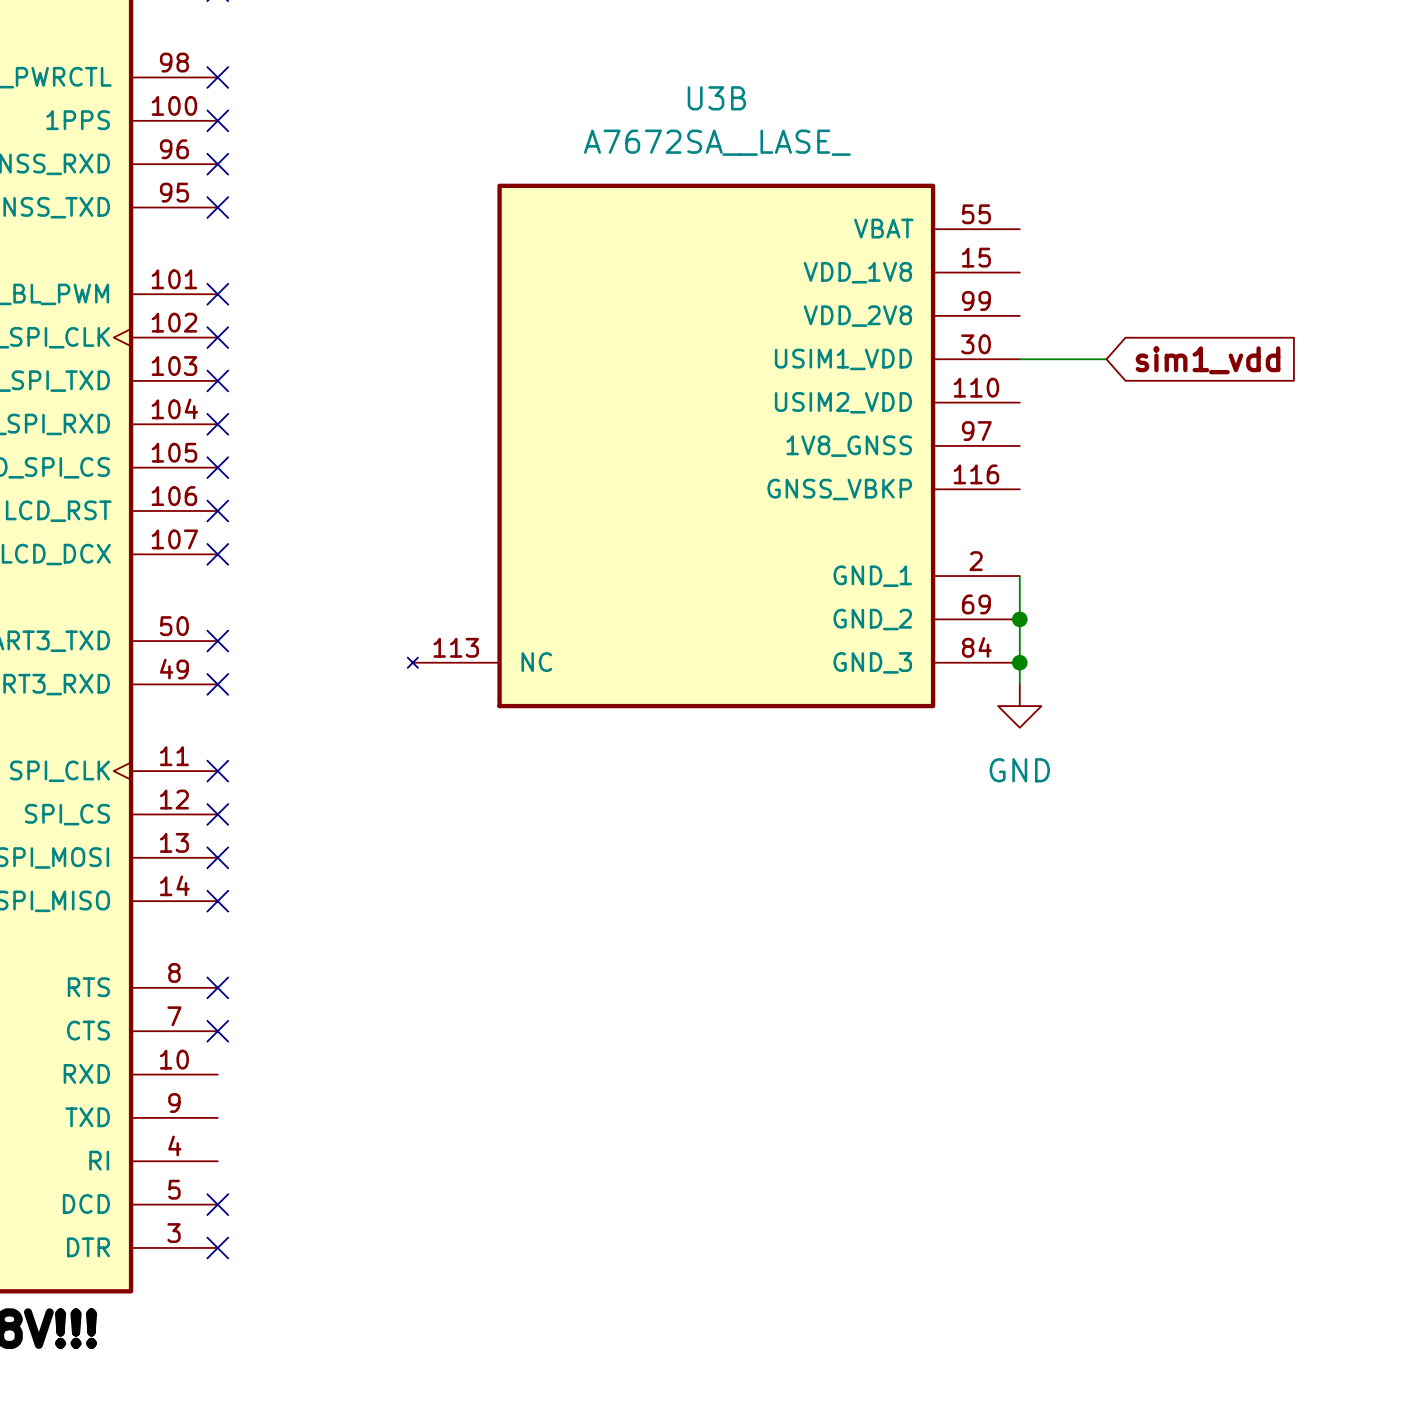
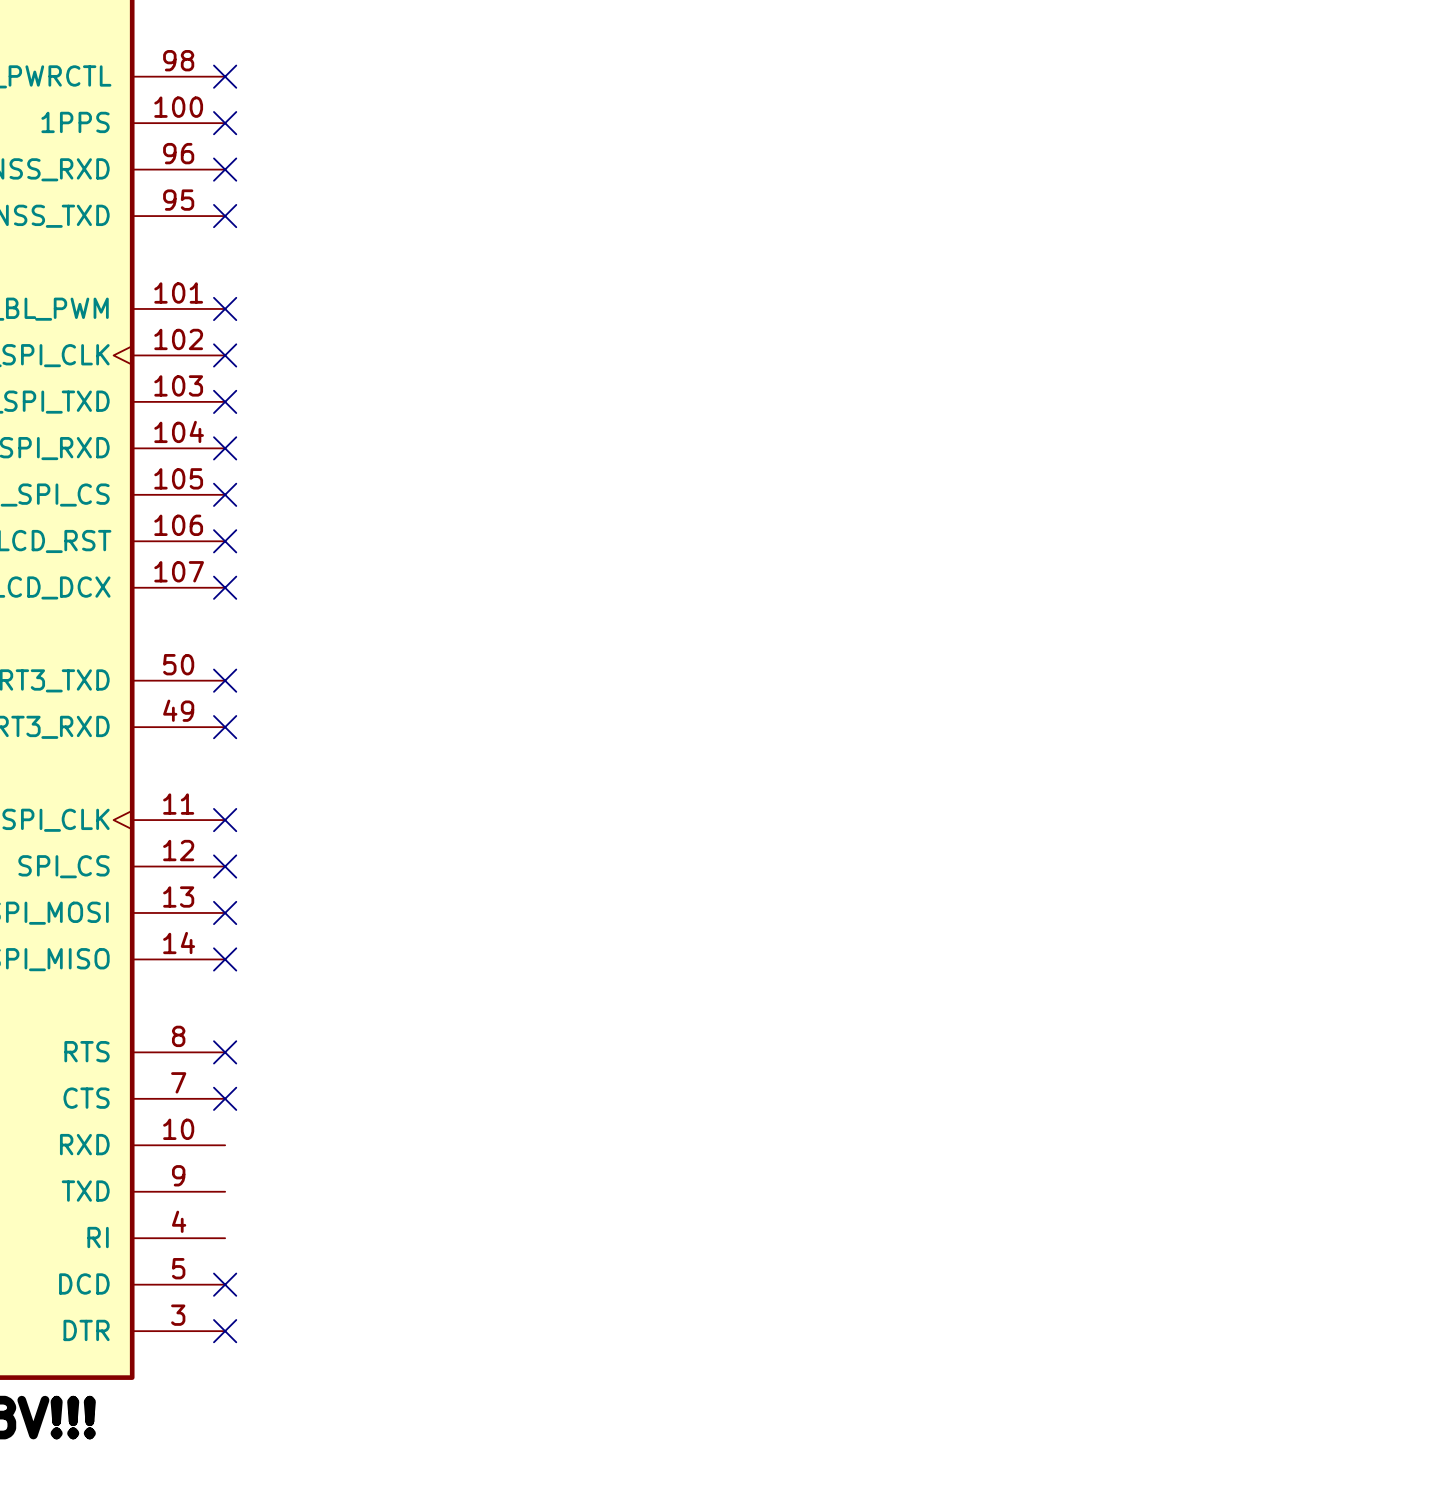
wire: (1019, 359) (1106, 359) -> none
global label: sim1_vdd (1208, 360) -> none
U3B: A7672SA__LASE_ (713, 445) -> none
wire: (1019, 576) (1019, 684) -> none
junction: (1019, 619) -> none
junction: (1019, 662) -> none
power symbol: GND (1019, 706) -> none

